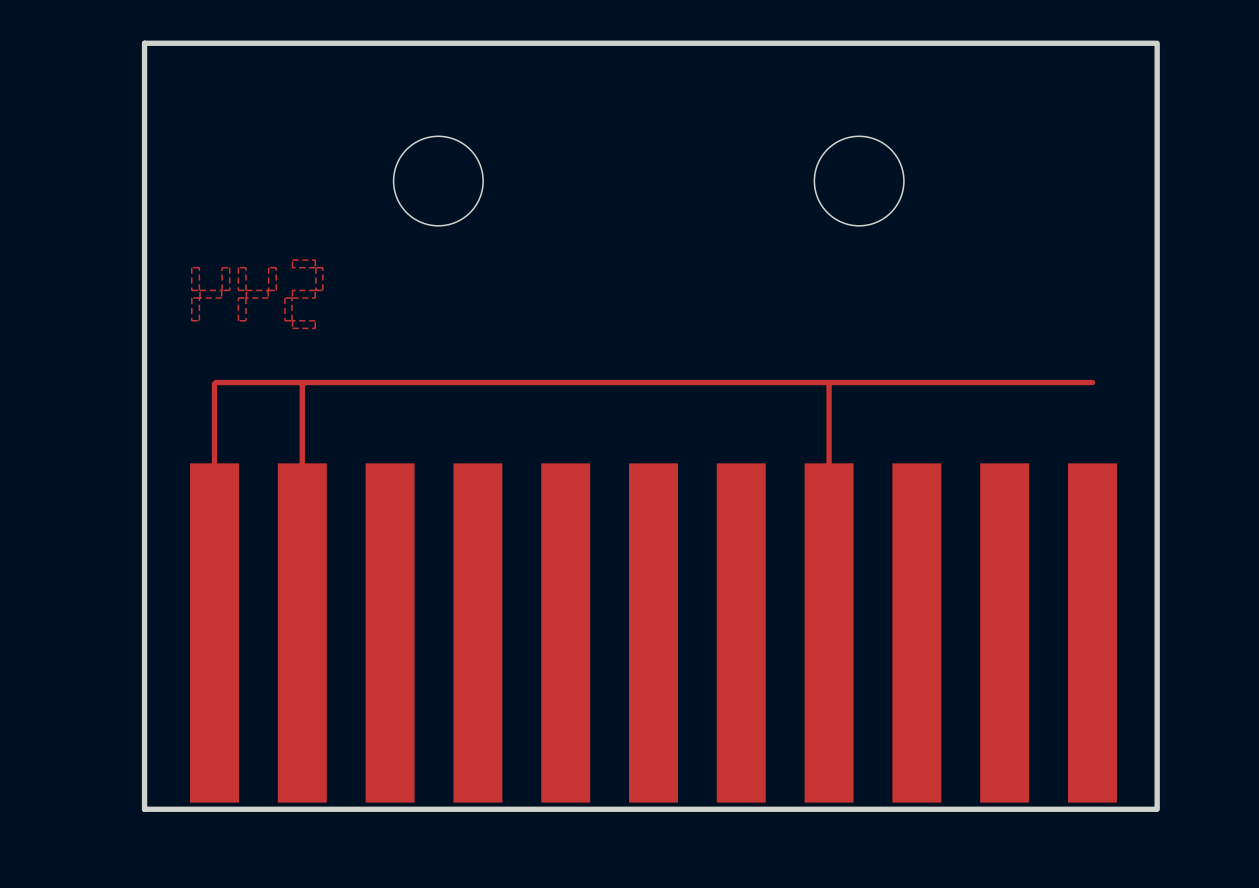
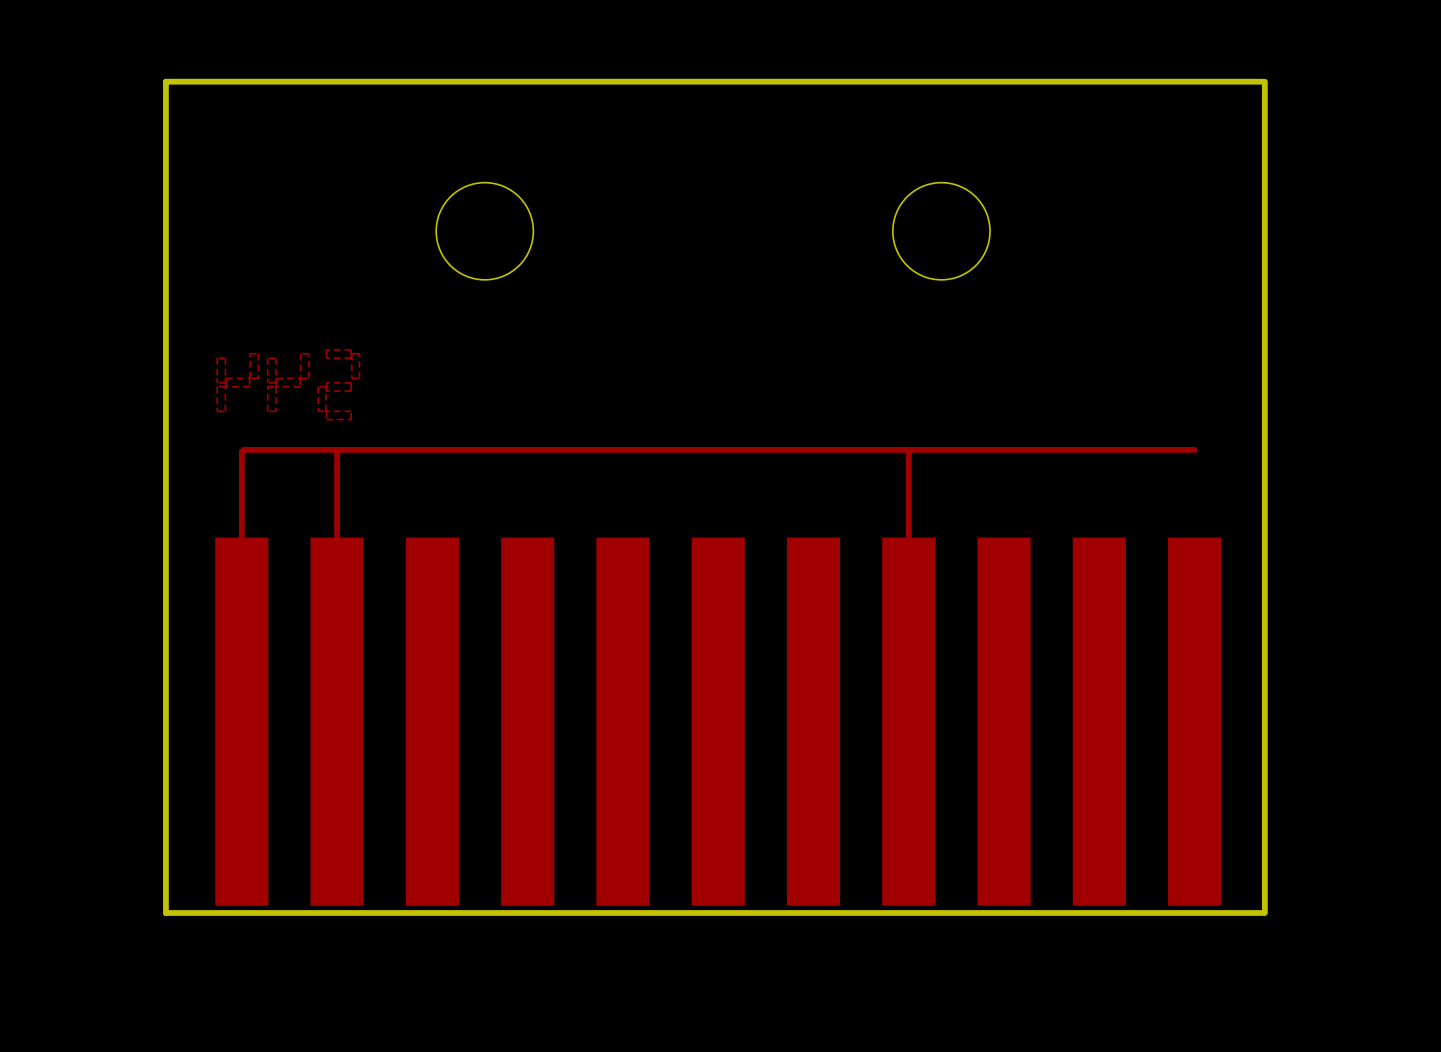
top zone outline: (315, 260) (315, 267) (292, 267) (292, 260) (315, 260) -> (351, 411) (351, 419) (326, 419) (326, 411) (351, 411)
top zone outline: (199, 267) (191, 267) (191, 290) (199, 290) (199, 267) -> (225, 386) (217, 386) (217, 411) (225, 411) (225, 386)
top zone outline: (229, 267) (222, 267) (222, 290) (229, 290) (229, 267) -> (258, 353) (250, 353) (250, 378) (258, 378) (258, 353)
top zone outline: (245, 267) (238, 267) (238, 290) (245, 290) (245, 267) -> (275, 386) (267, 386) (267, 411) (275, 411) (275, 386)
top zone outline: (276, 267) (268, 267) (268, 290) (276, 290) (276, 267) -> (308, 353) (300, 353) (300, 378) (308, 378) (308, 353)
top zone outline: (322, 267) (322, 290) (315, 290) (315, 267) (322, 267) -> (359, 353) (359, 378) (351, 378) (351, 353) (359, 353)
top zone outline: (221, 290) (199, 290) (199, 298) (221, 298) (221, 290) -> (249, 378) (226, 378) (226, 386) (249, 386) (249, 378)
top zone outline: (268, 290) (246, 290) (246, 298) (268, 298) (268, 290) -> (300, 378) (276, 378) (276, 386) (300, 386) (300, 378)
top zone outline: (291, 298) (284, 298) (284, 320) (291, 320) (291, 298) -> (325, 386) (318, 386) (318, 411) (325, 411) (325, 386)

